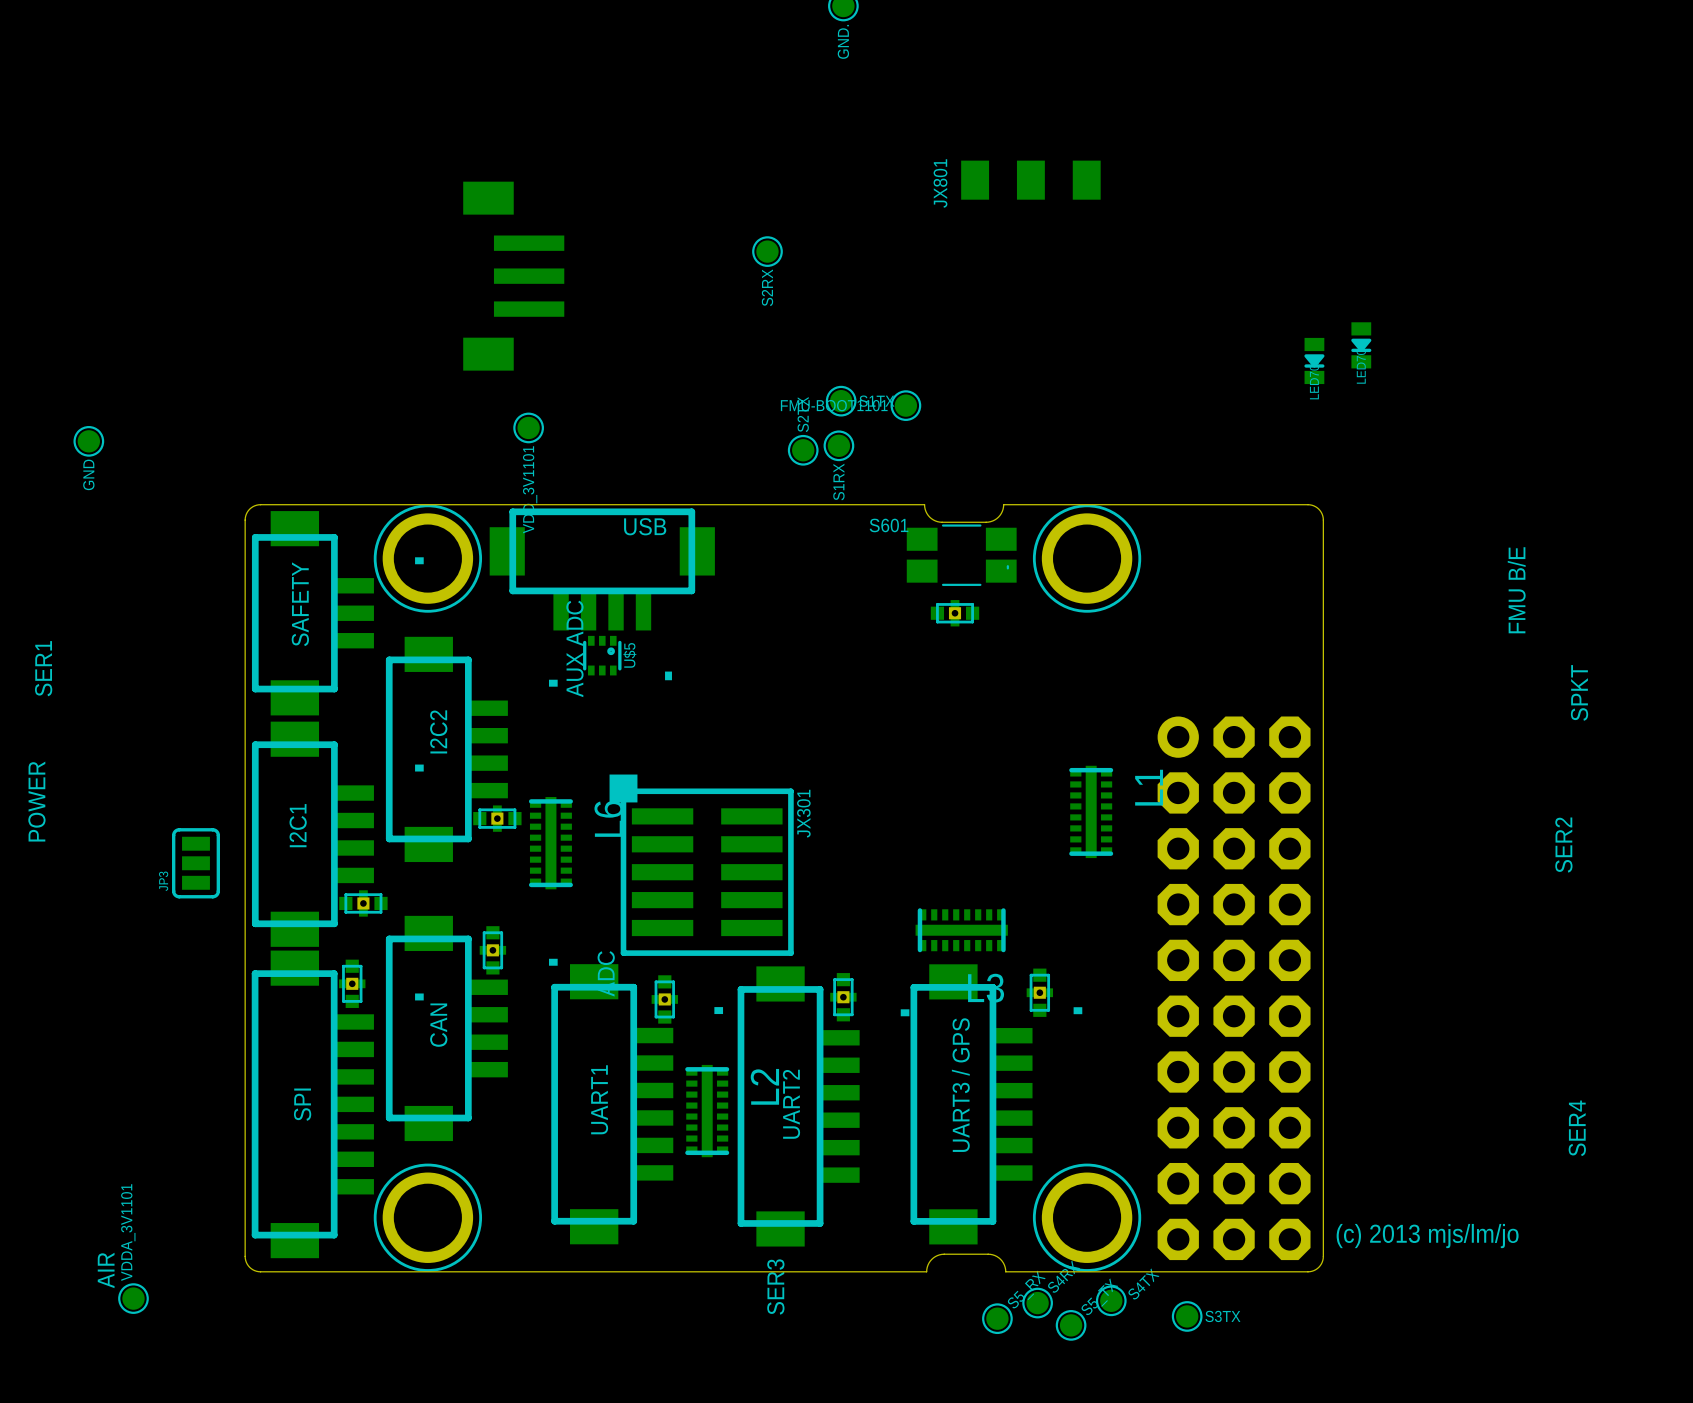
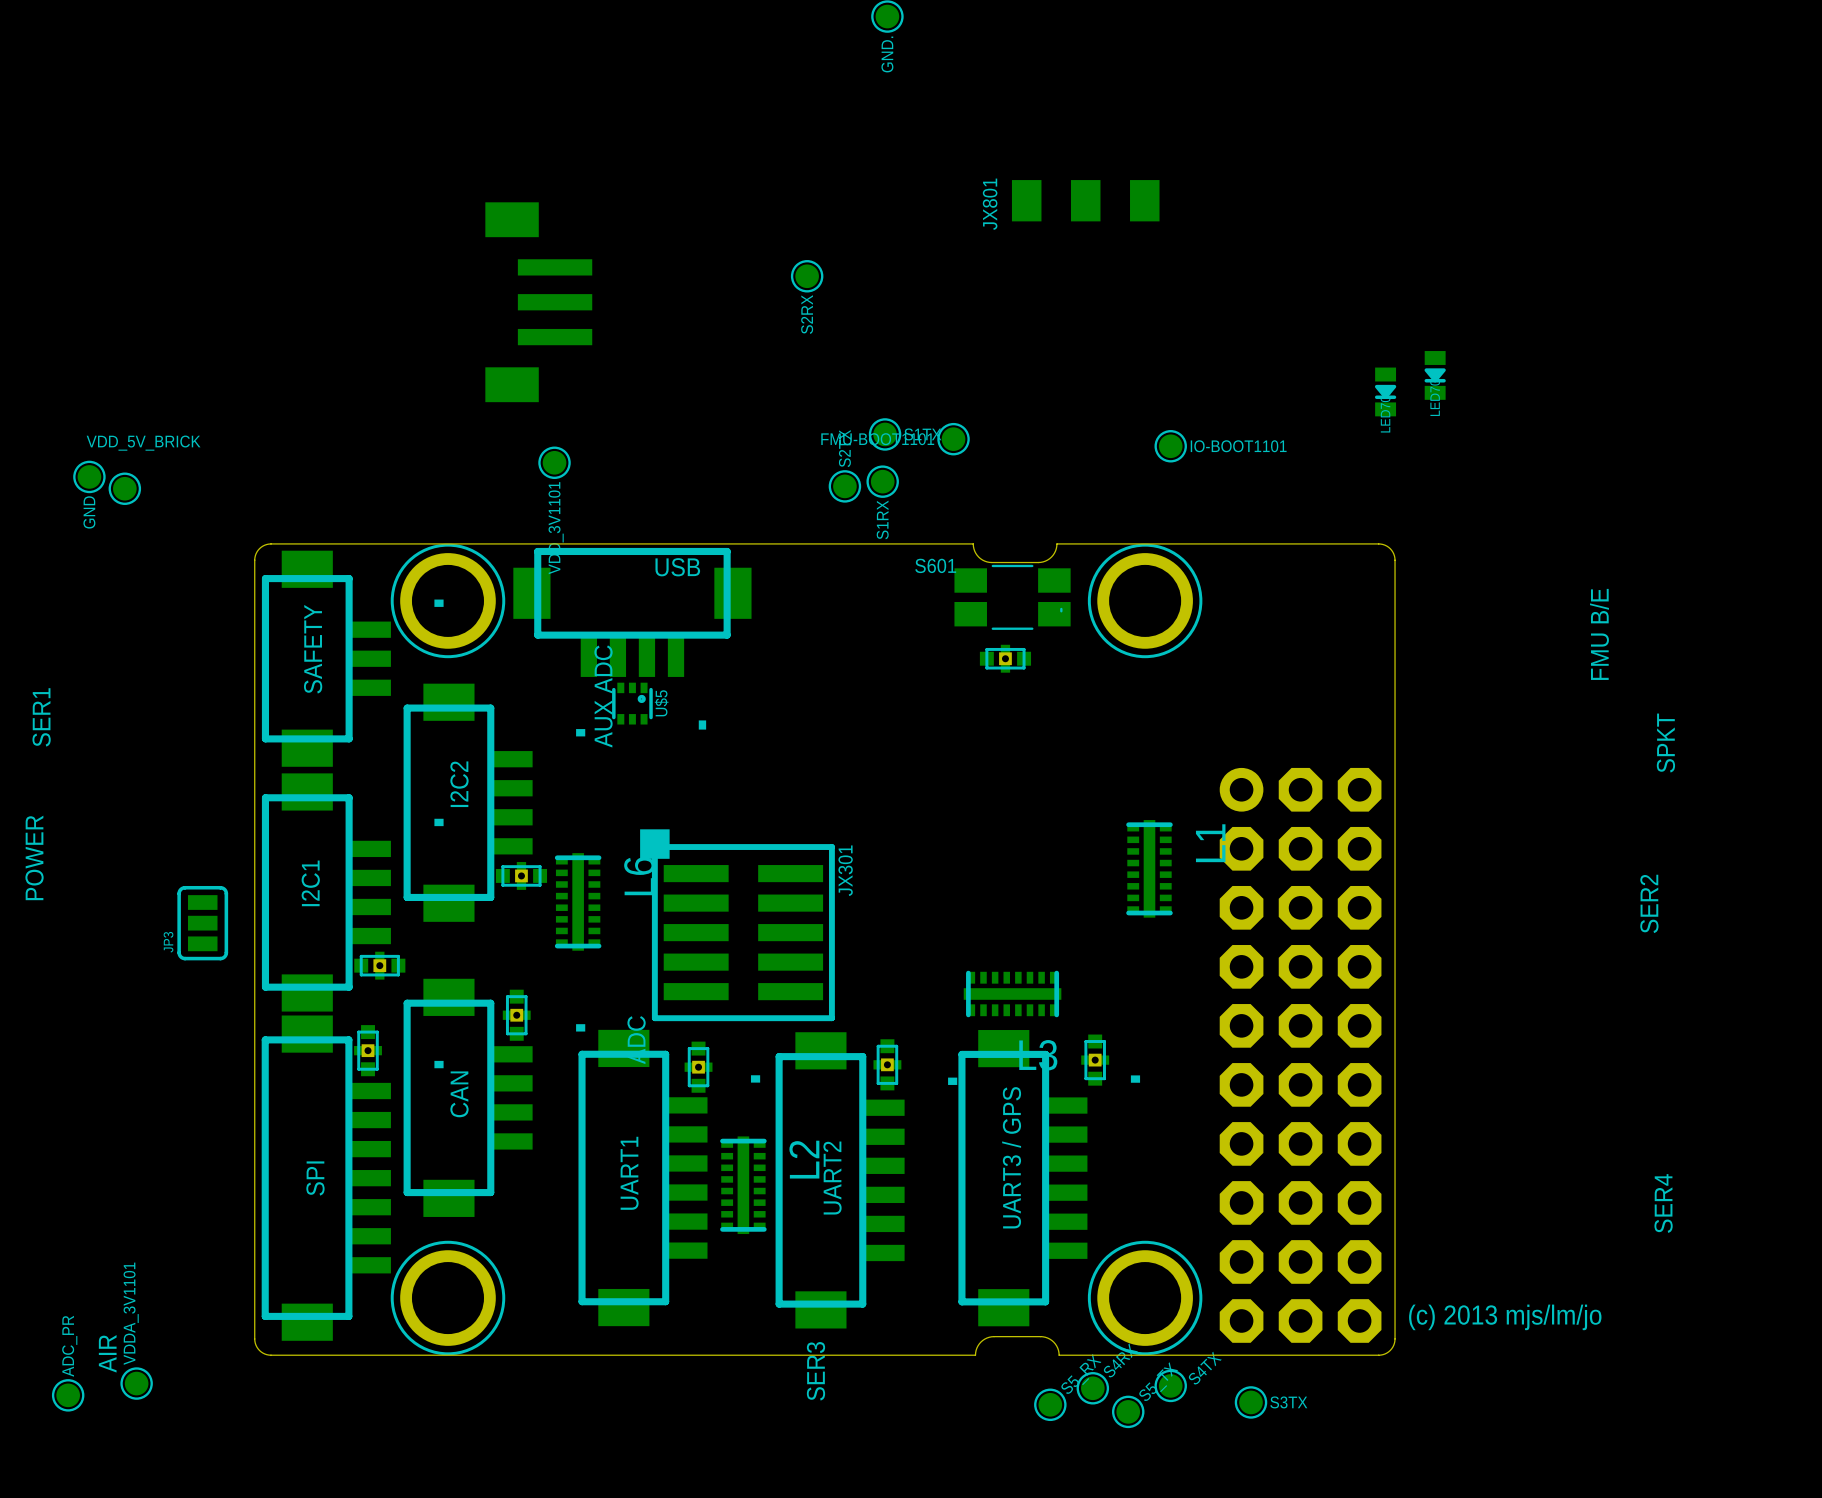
IO-BOOT1101: none -> (1170, 446)
VDD_5V_BRICK: none -> (124, 488)
ADC_PR: none -> (68, 1395)

